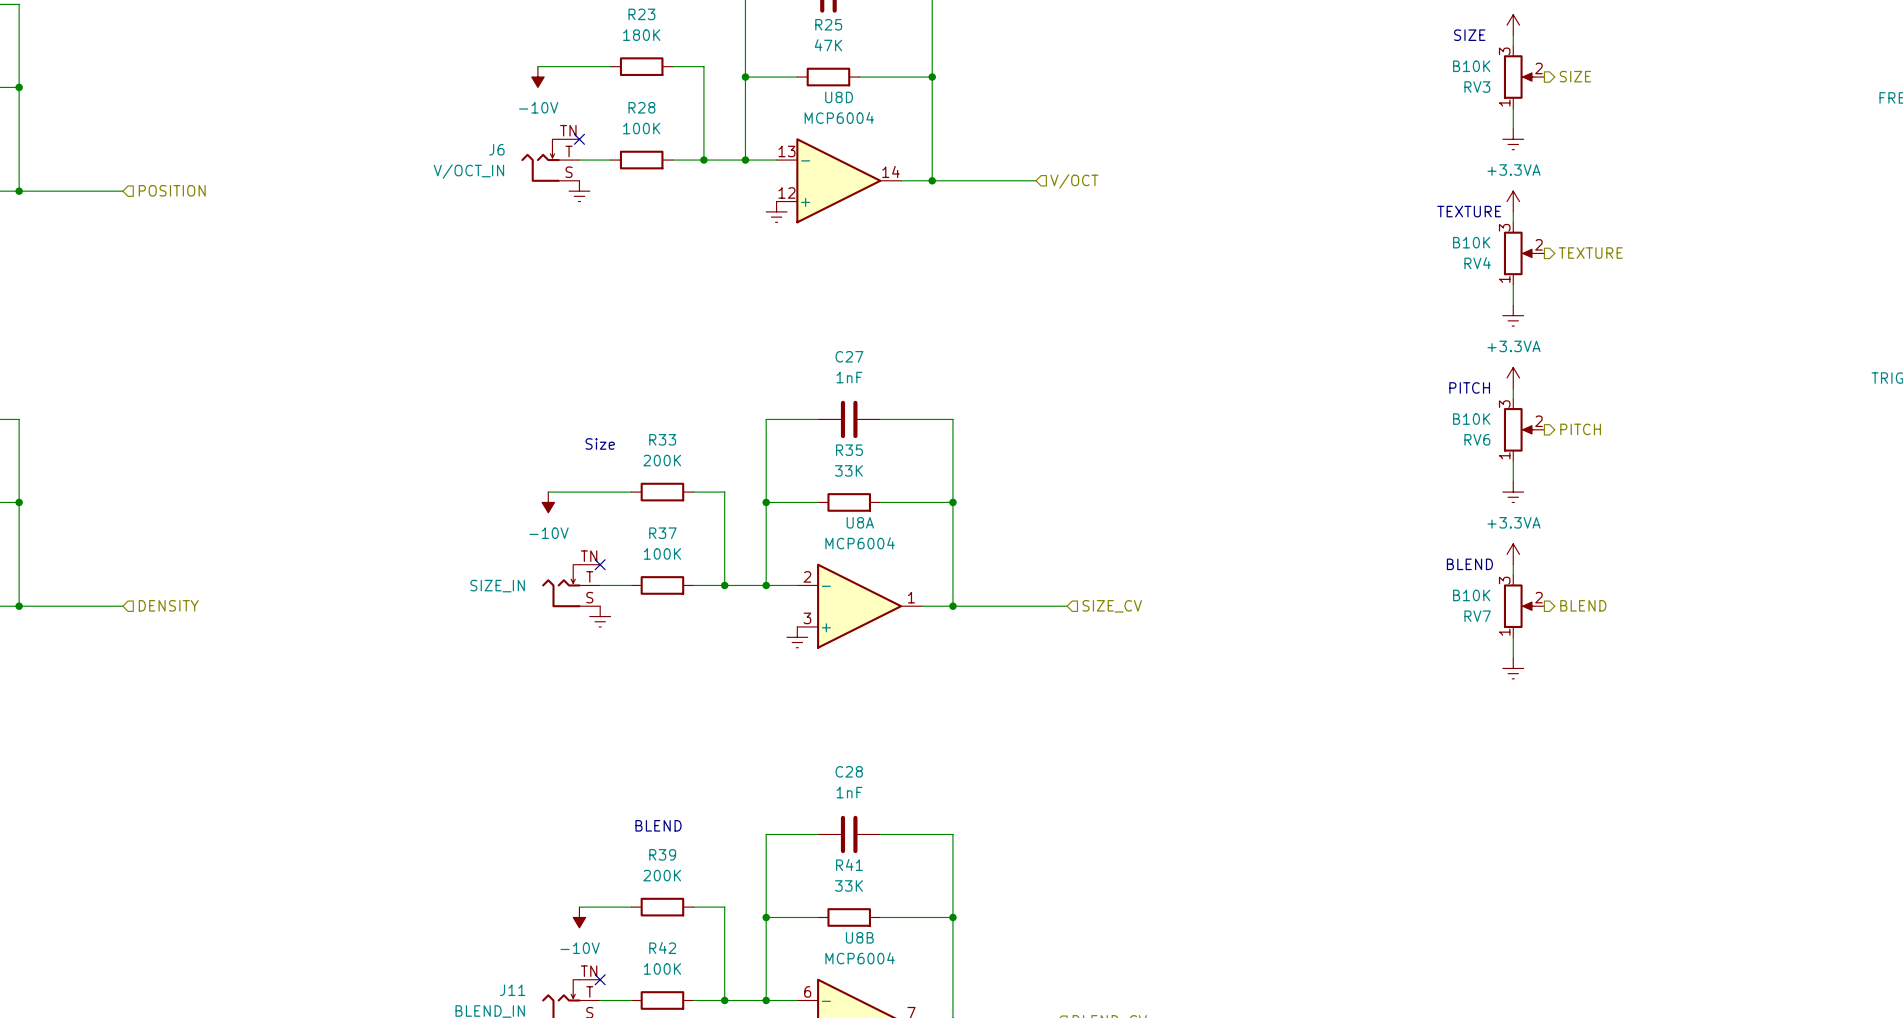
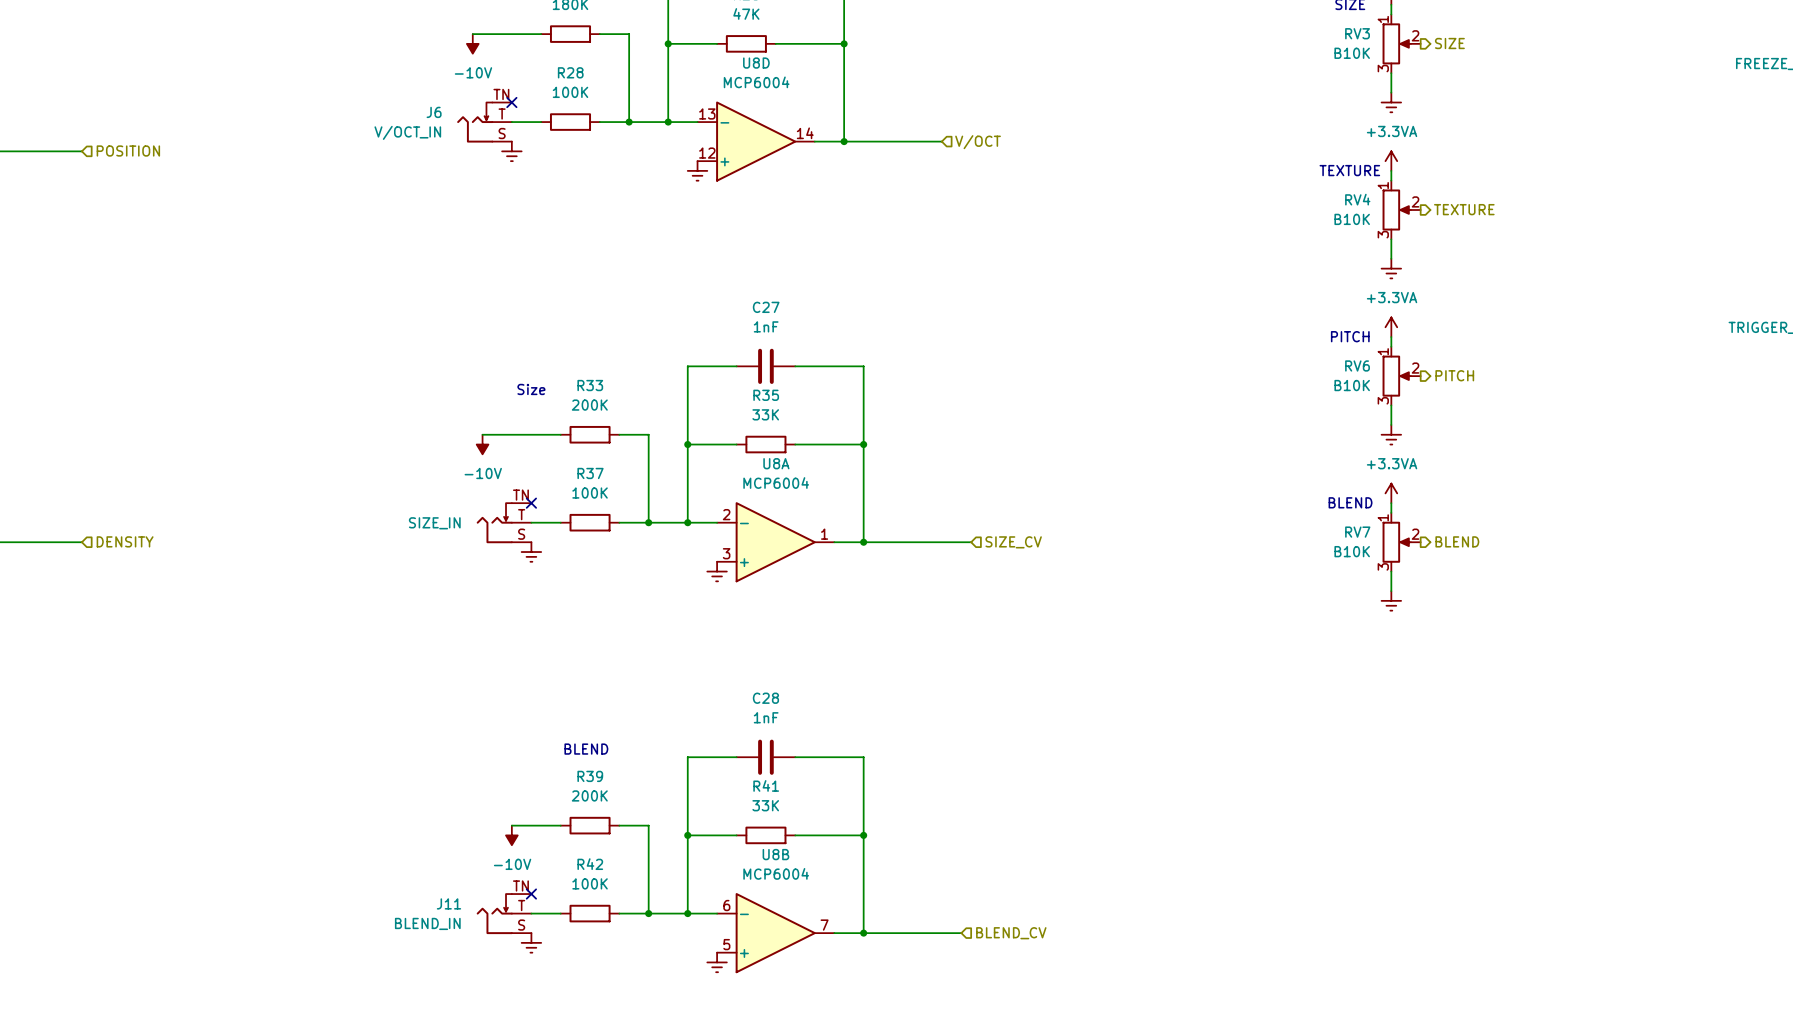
RV3 flip: as is (1518, 77) -> up-down (1396, 43)
RV4 flip: as is (1518, 253) -> up-down (1396, 210)
RV6 flip: as is (1518, 429) -> up-down (1396, 376)
RV7 flip: as is (1518, 606) -> up-down (1396, 542)

